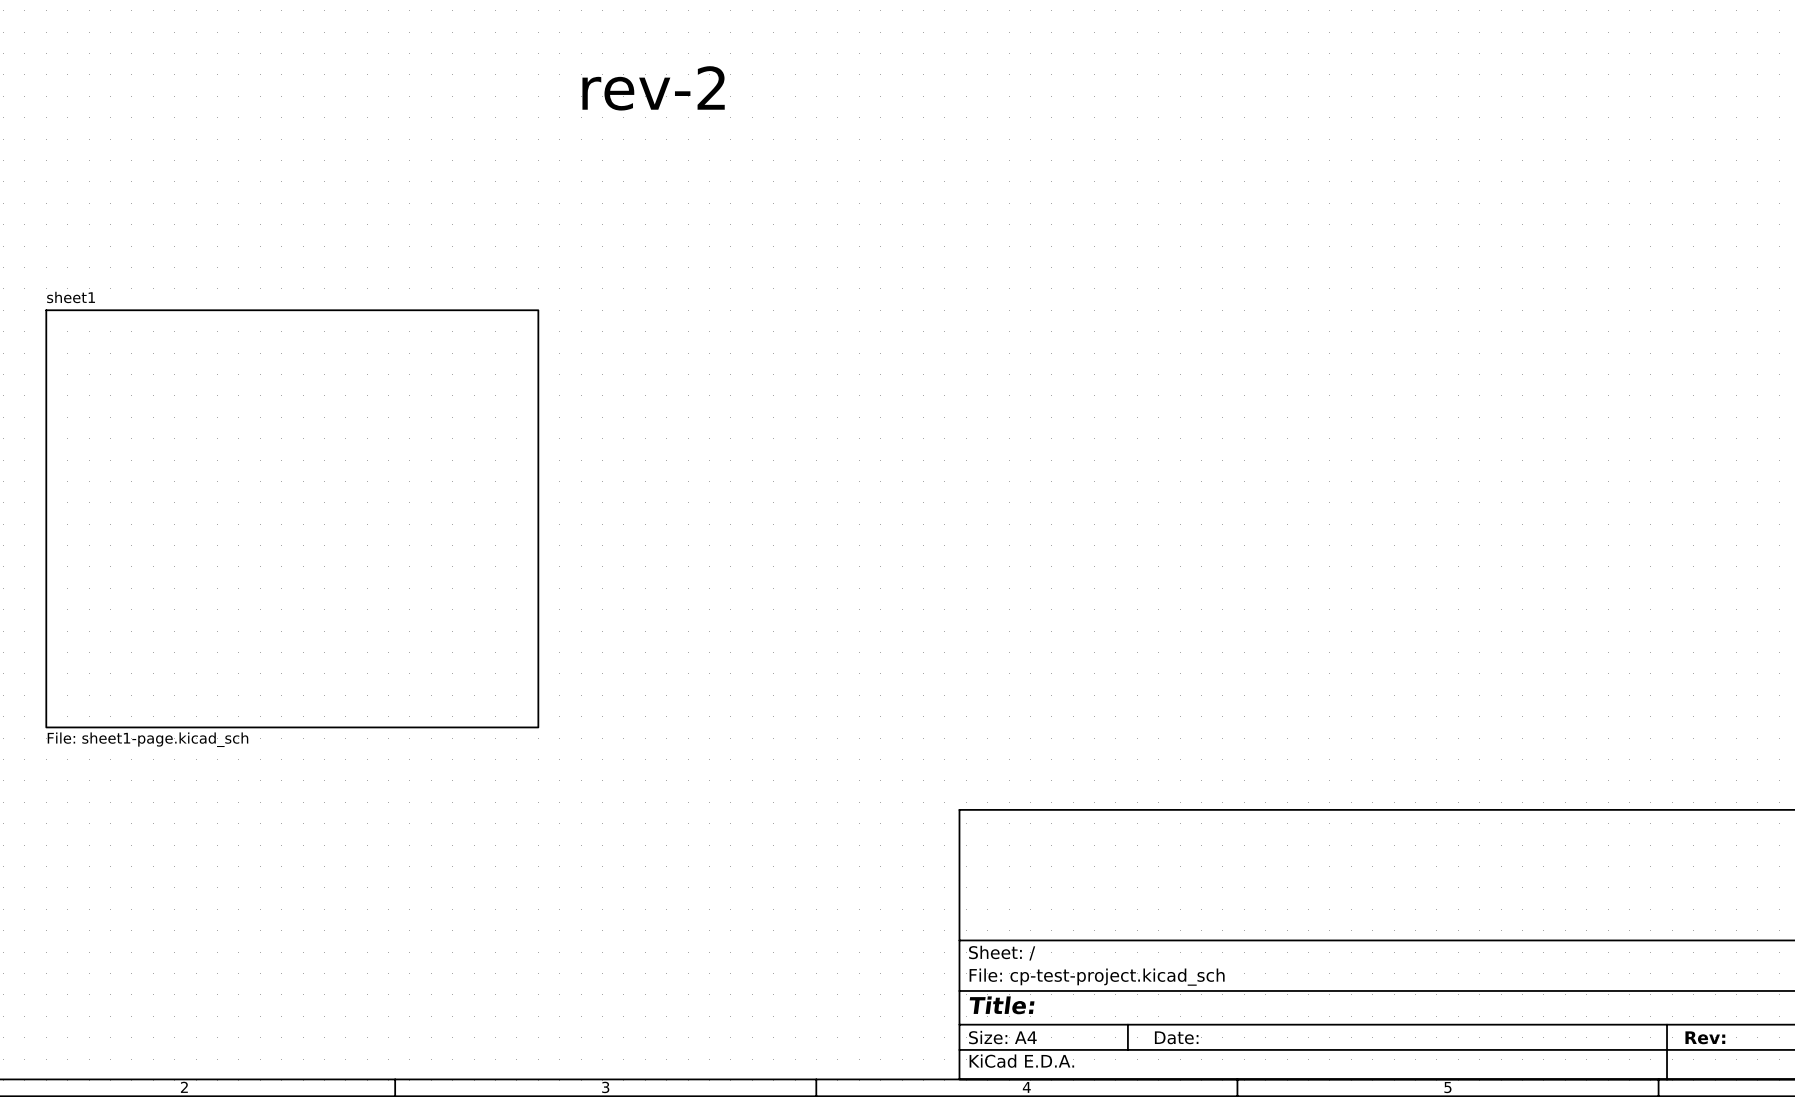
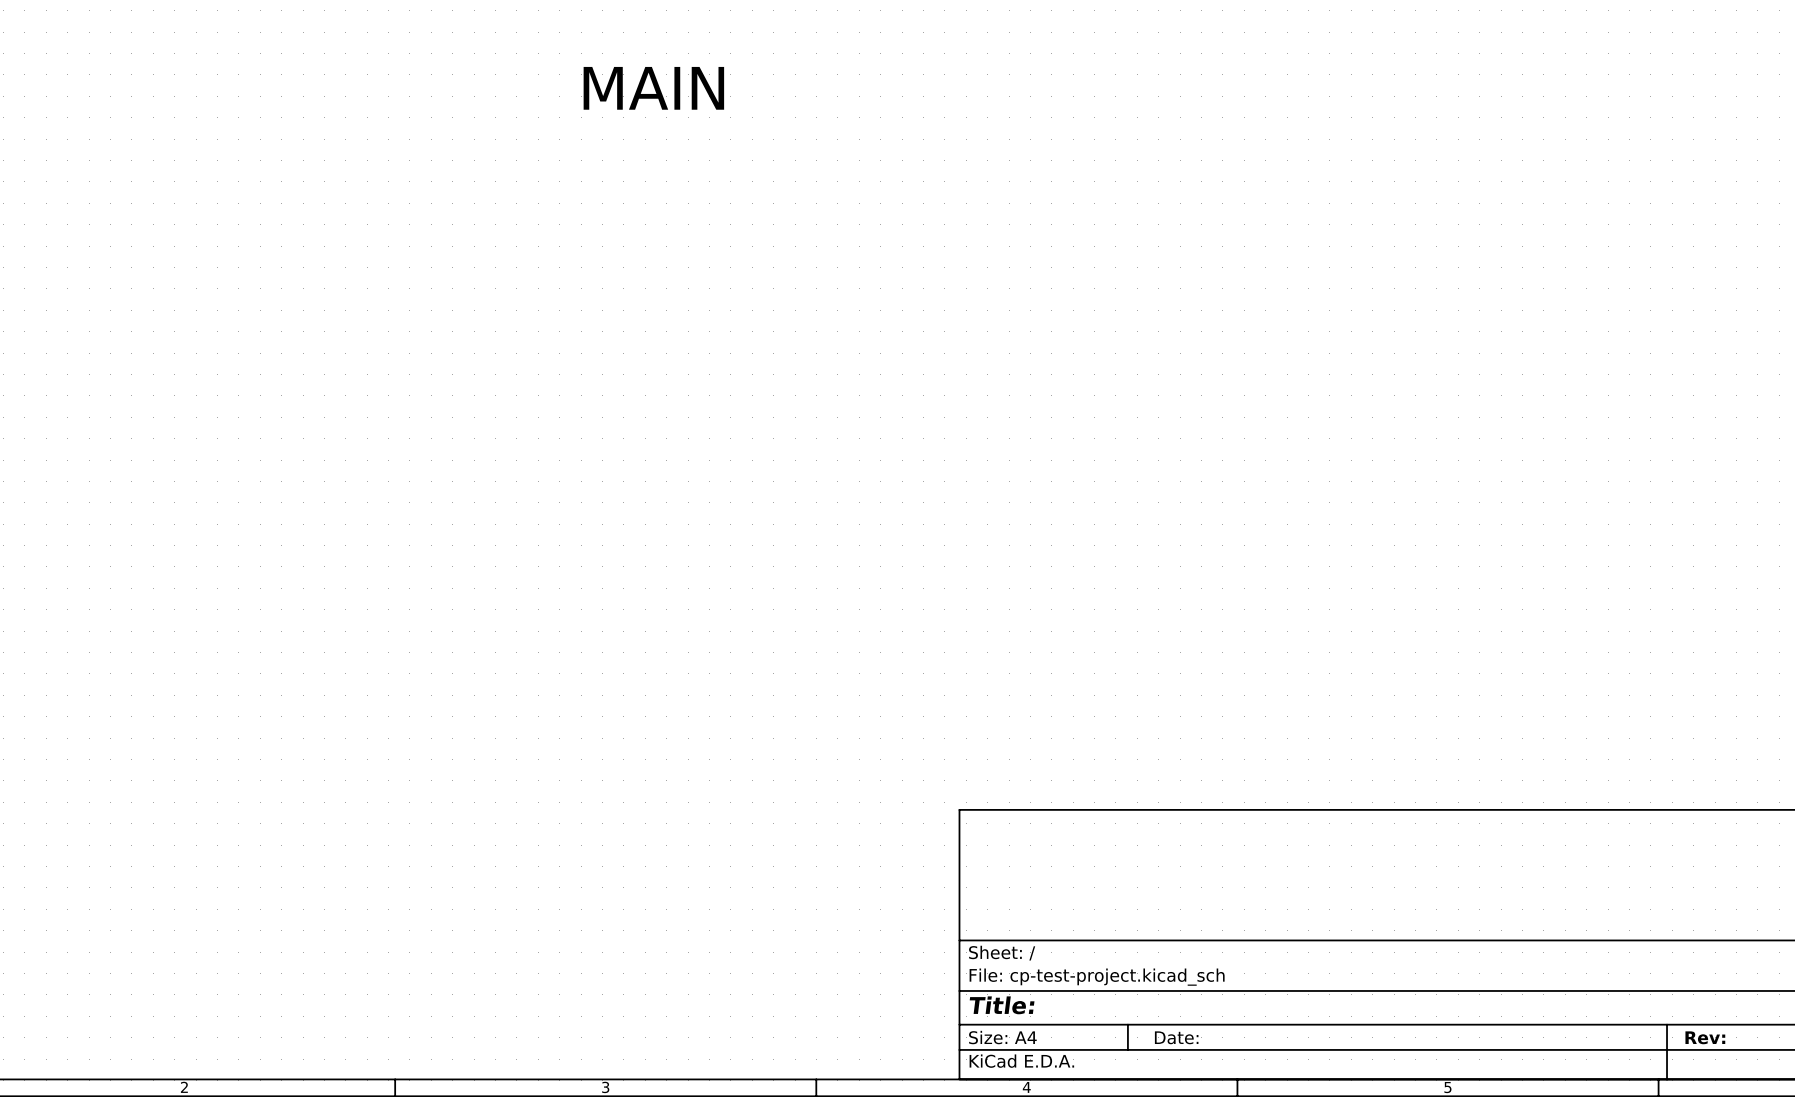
text: rev-2 (653, 88) -> MAIN (653, 88)
sheet sheet1: File: sheet1-page.kicad_sch (292, 518) -> none

